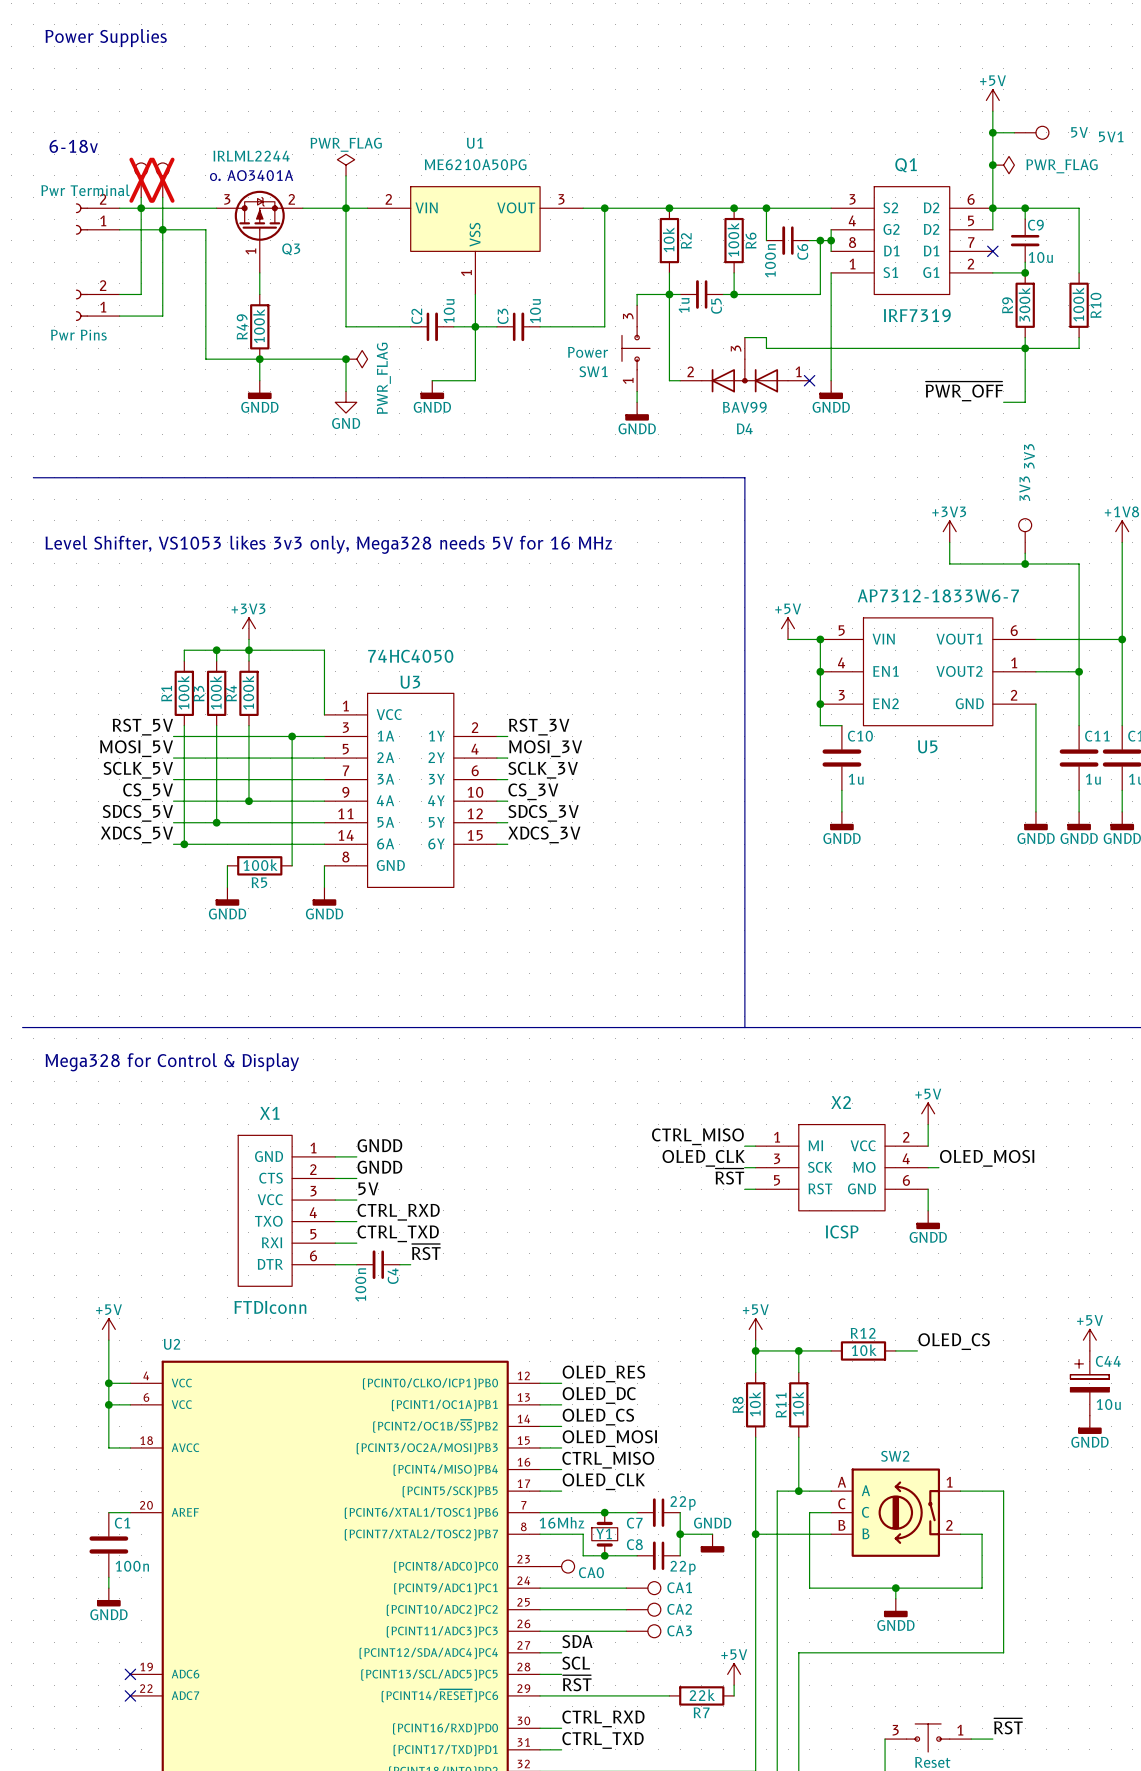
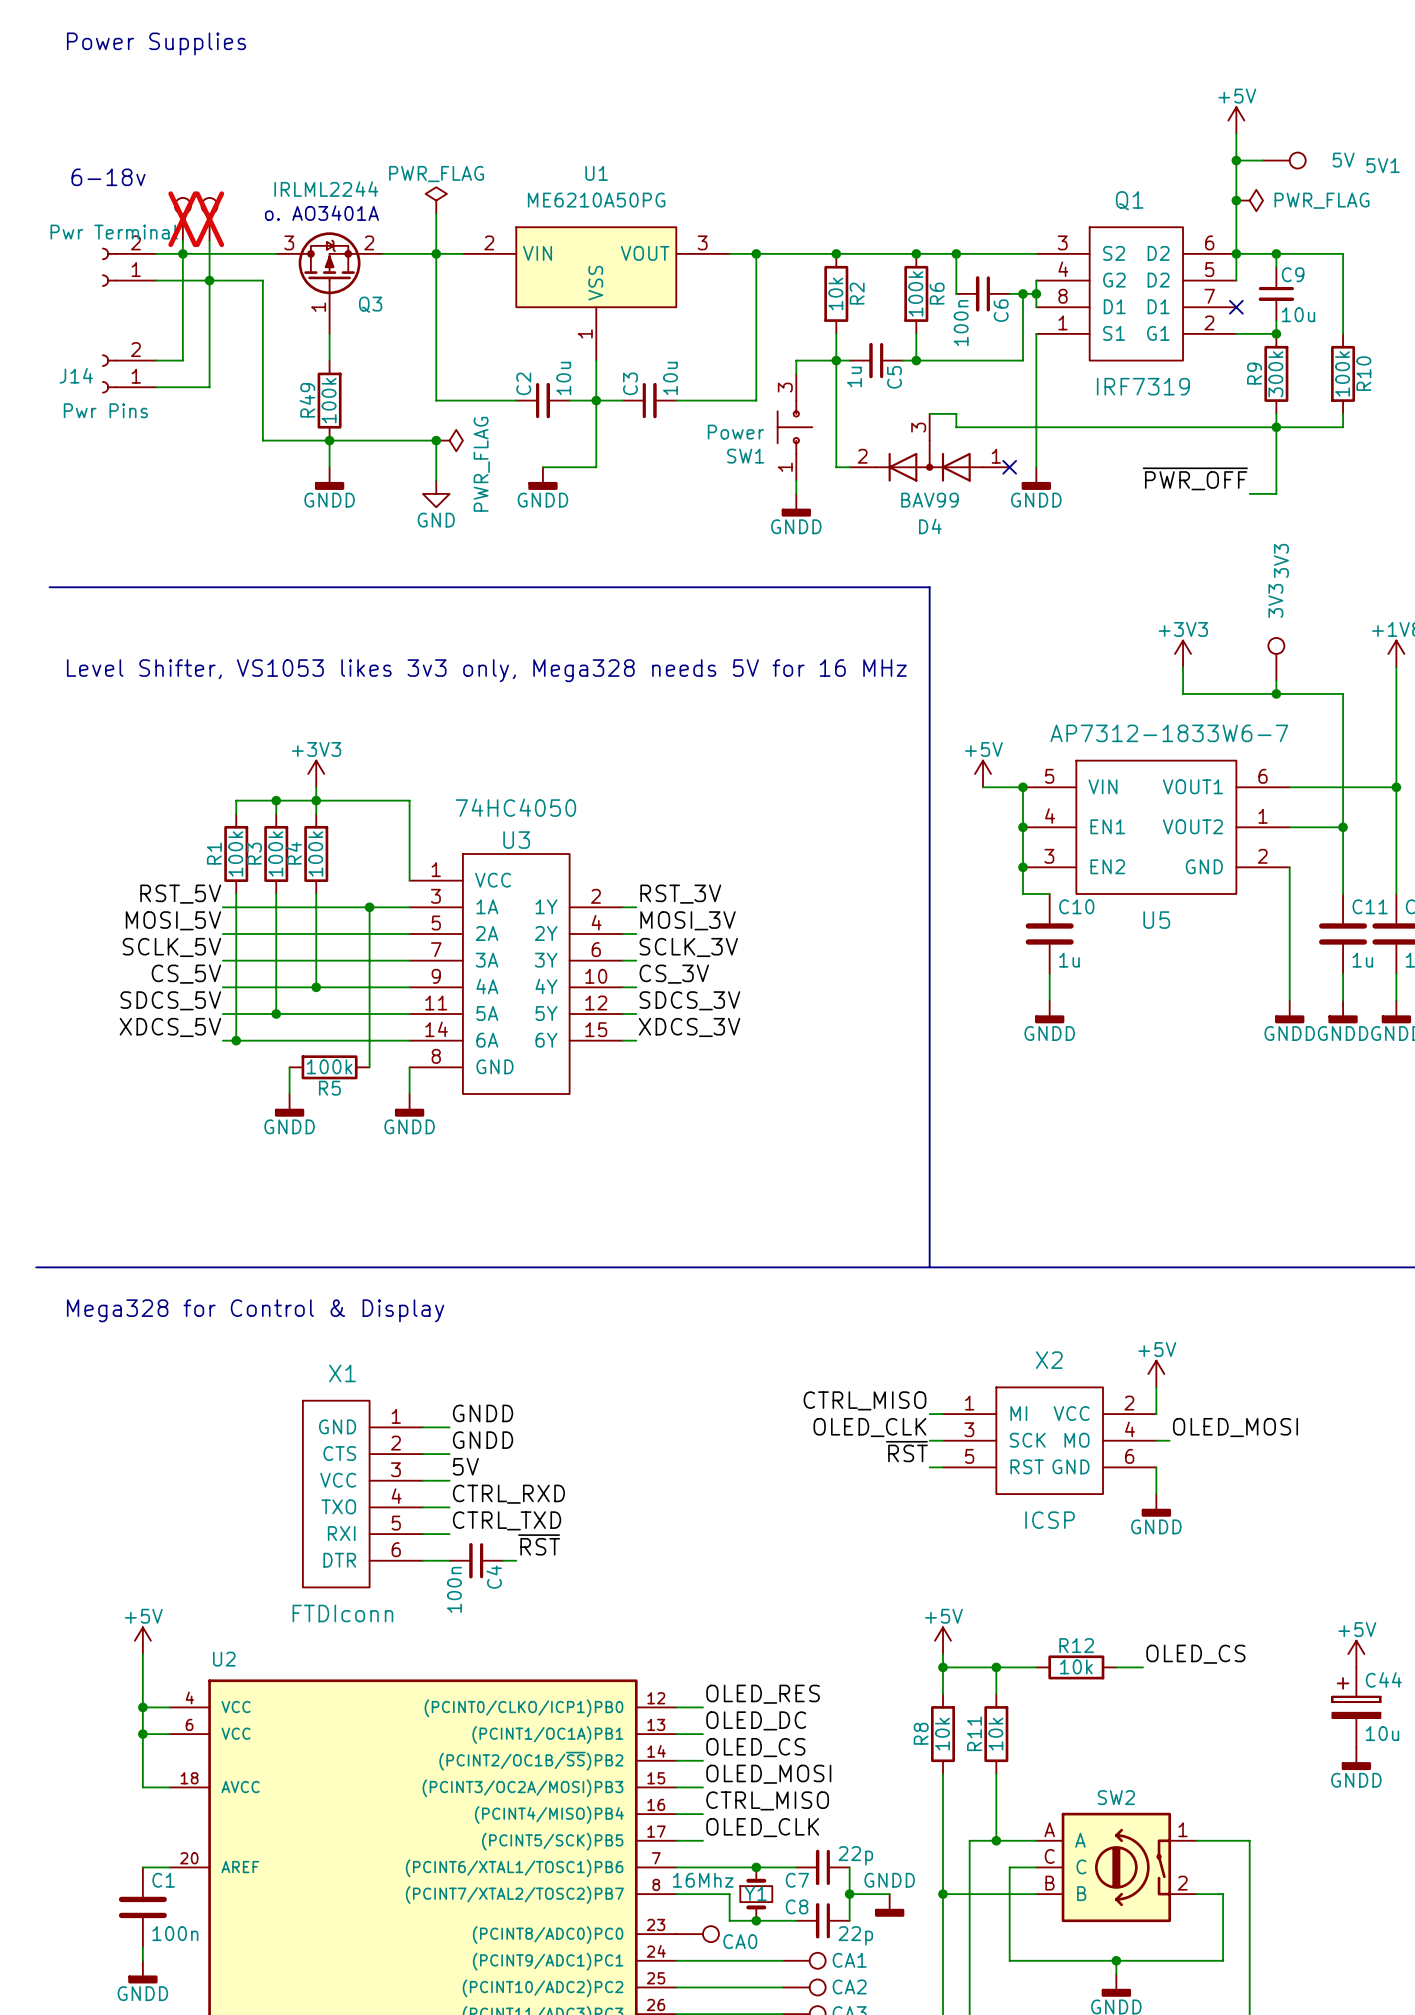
J14 name: none -> J14 (76, 375)

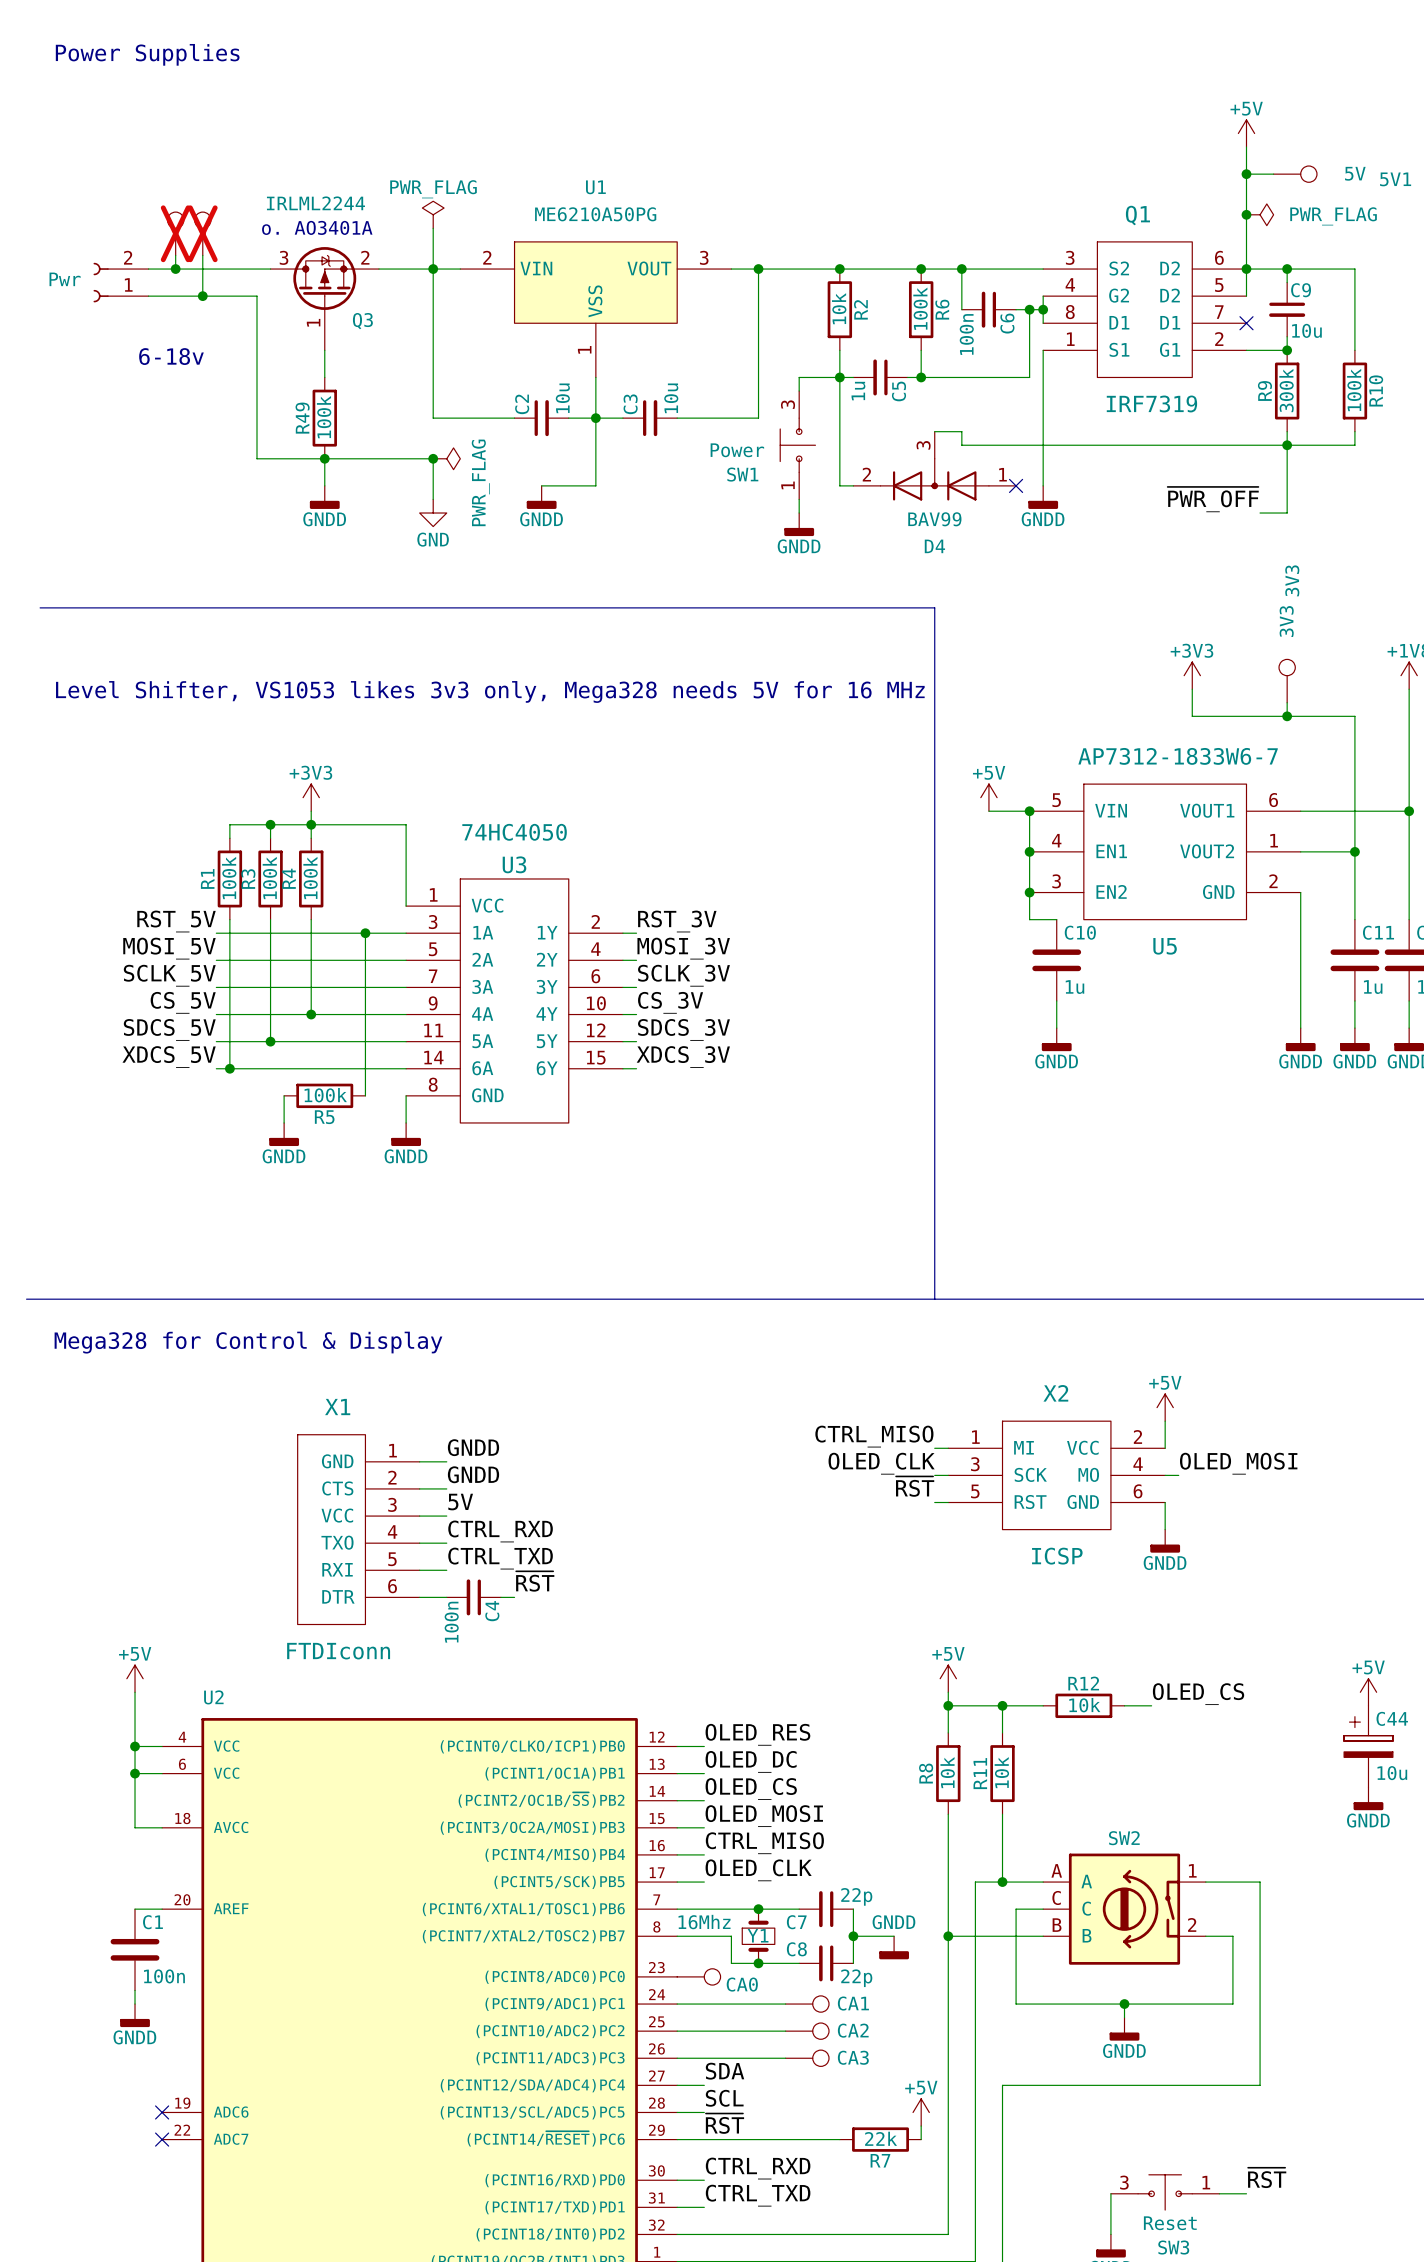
text position: 6-18v (108, 177) -> 6-18v (171, 356)
part value: Pwr Terminal (114, 232) -> Pwr (65, 279)
wire: (182, 253) (182, 360) (156, 360) -> none
wire: (209, 280) (209, 387) (156, 387) -> none
J14: Pwr Pins (129, 373) -> none

